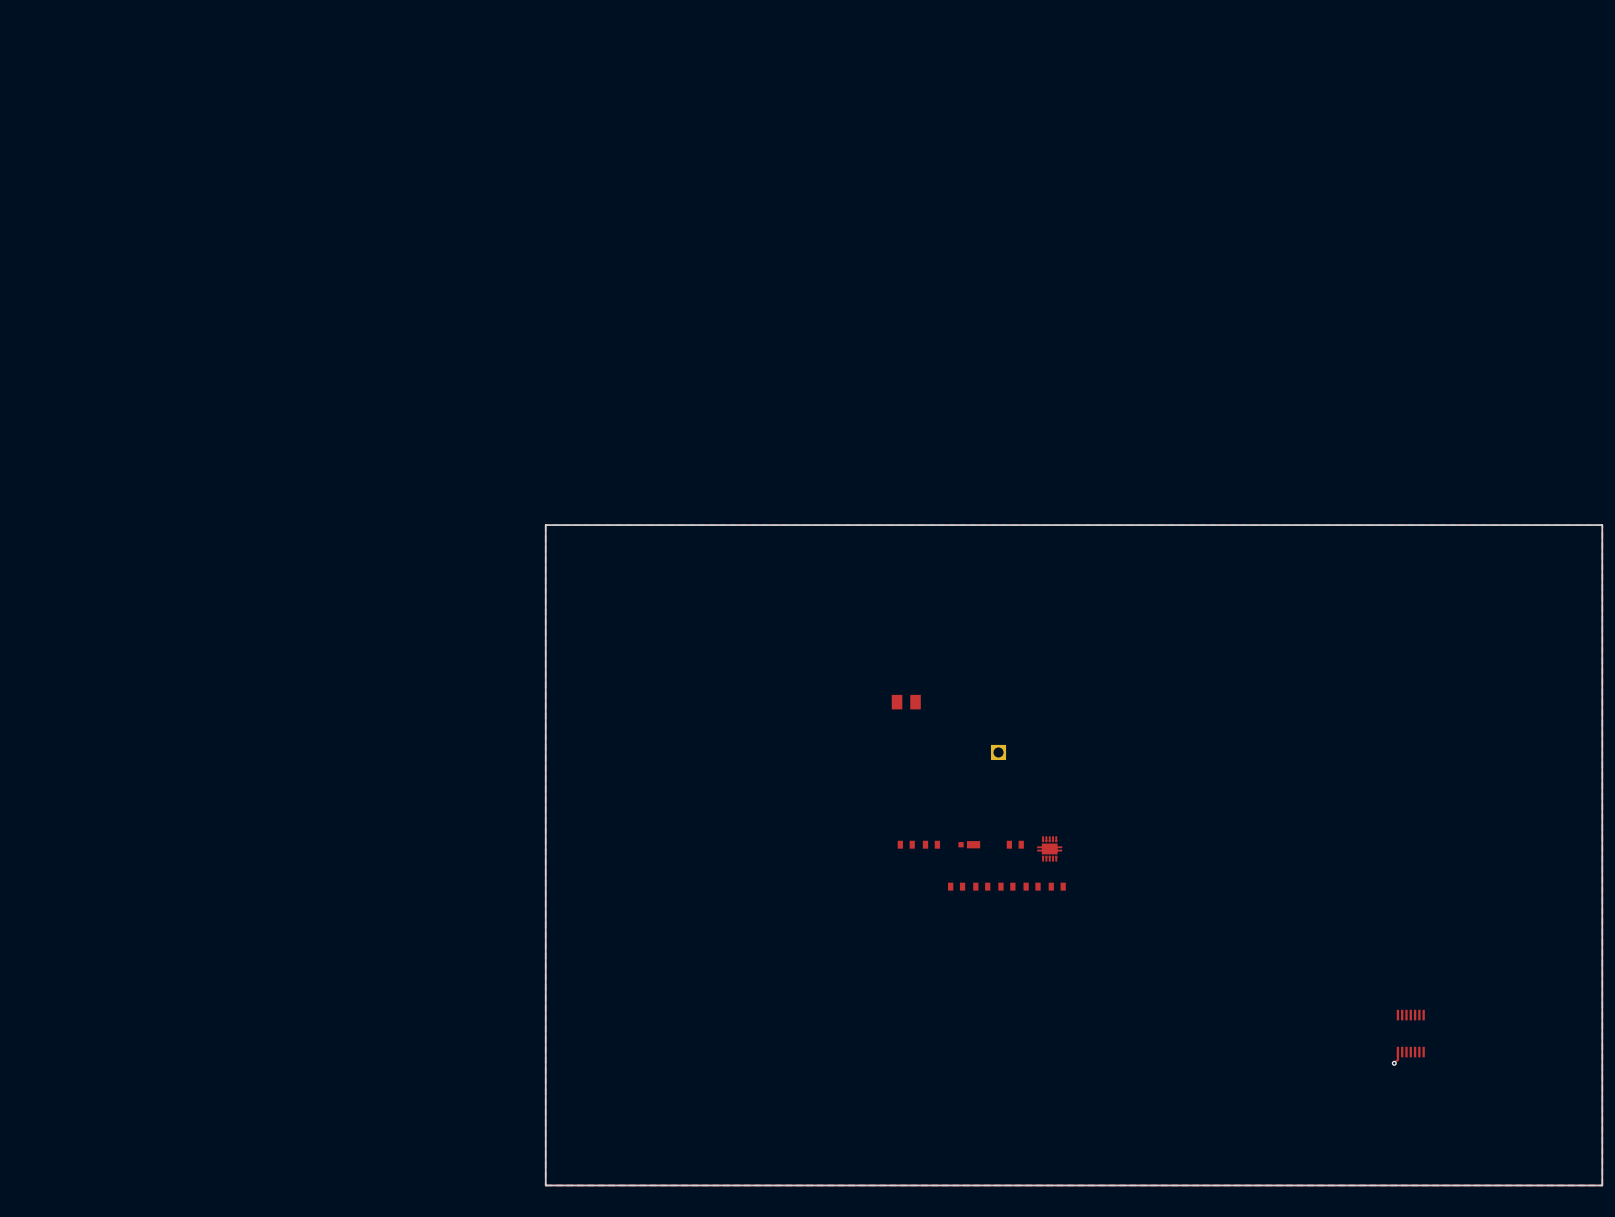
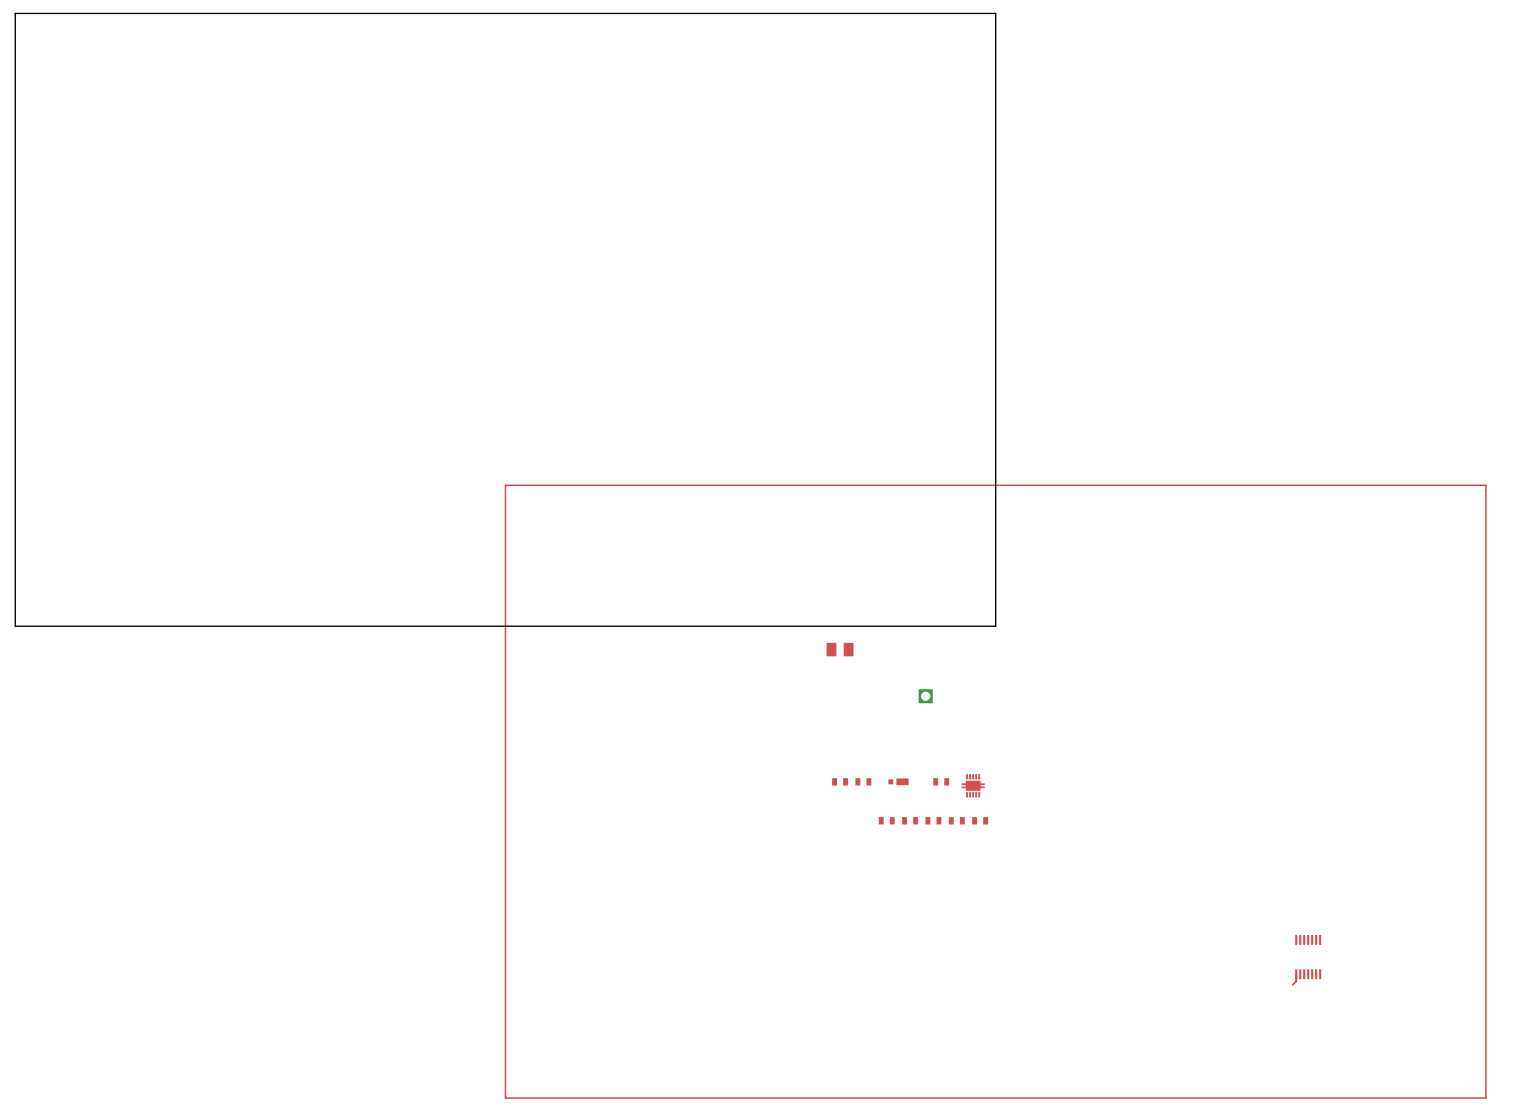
board edge: none -> (995, 13) (15, 13) (15, 626) (995, 626) (995, 13)
board edge: (1602, 525) (545, 525) (545, 1185) (1602, 1185) (1602, 525) -> none
via: (1394, 1063) -> none

